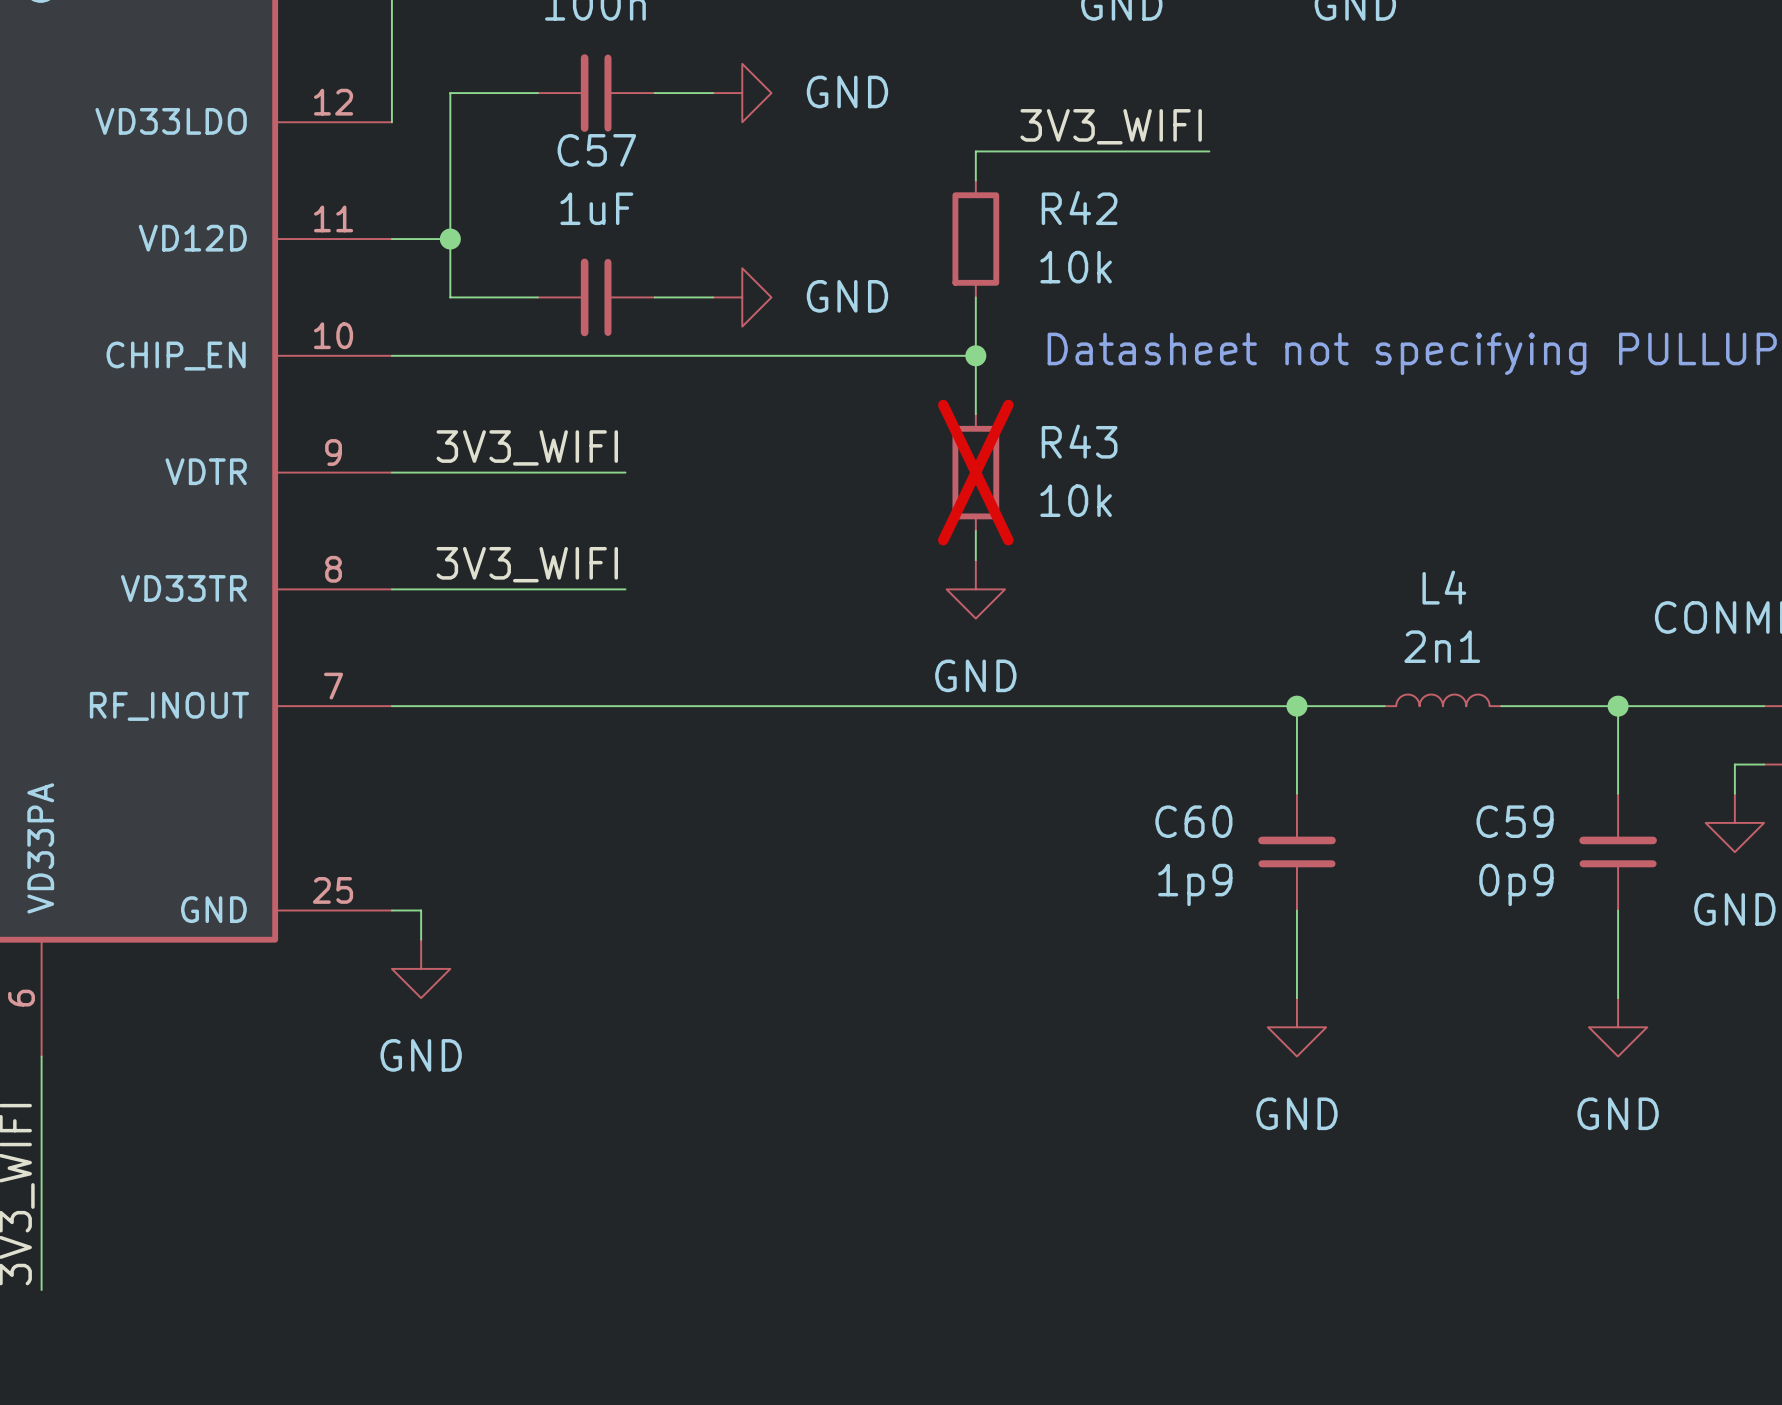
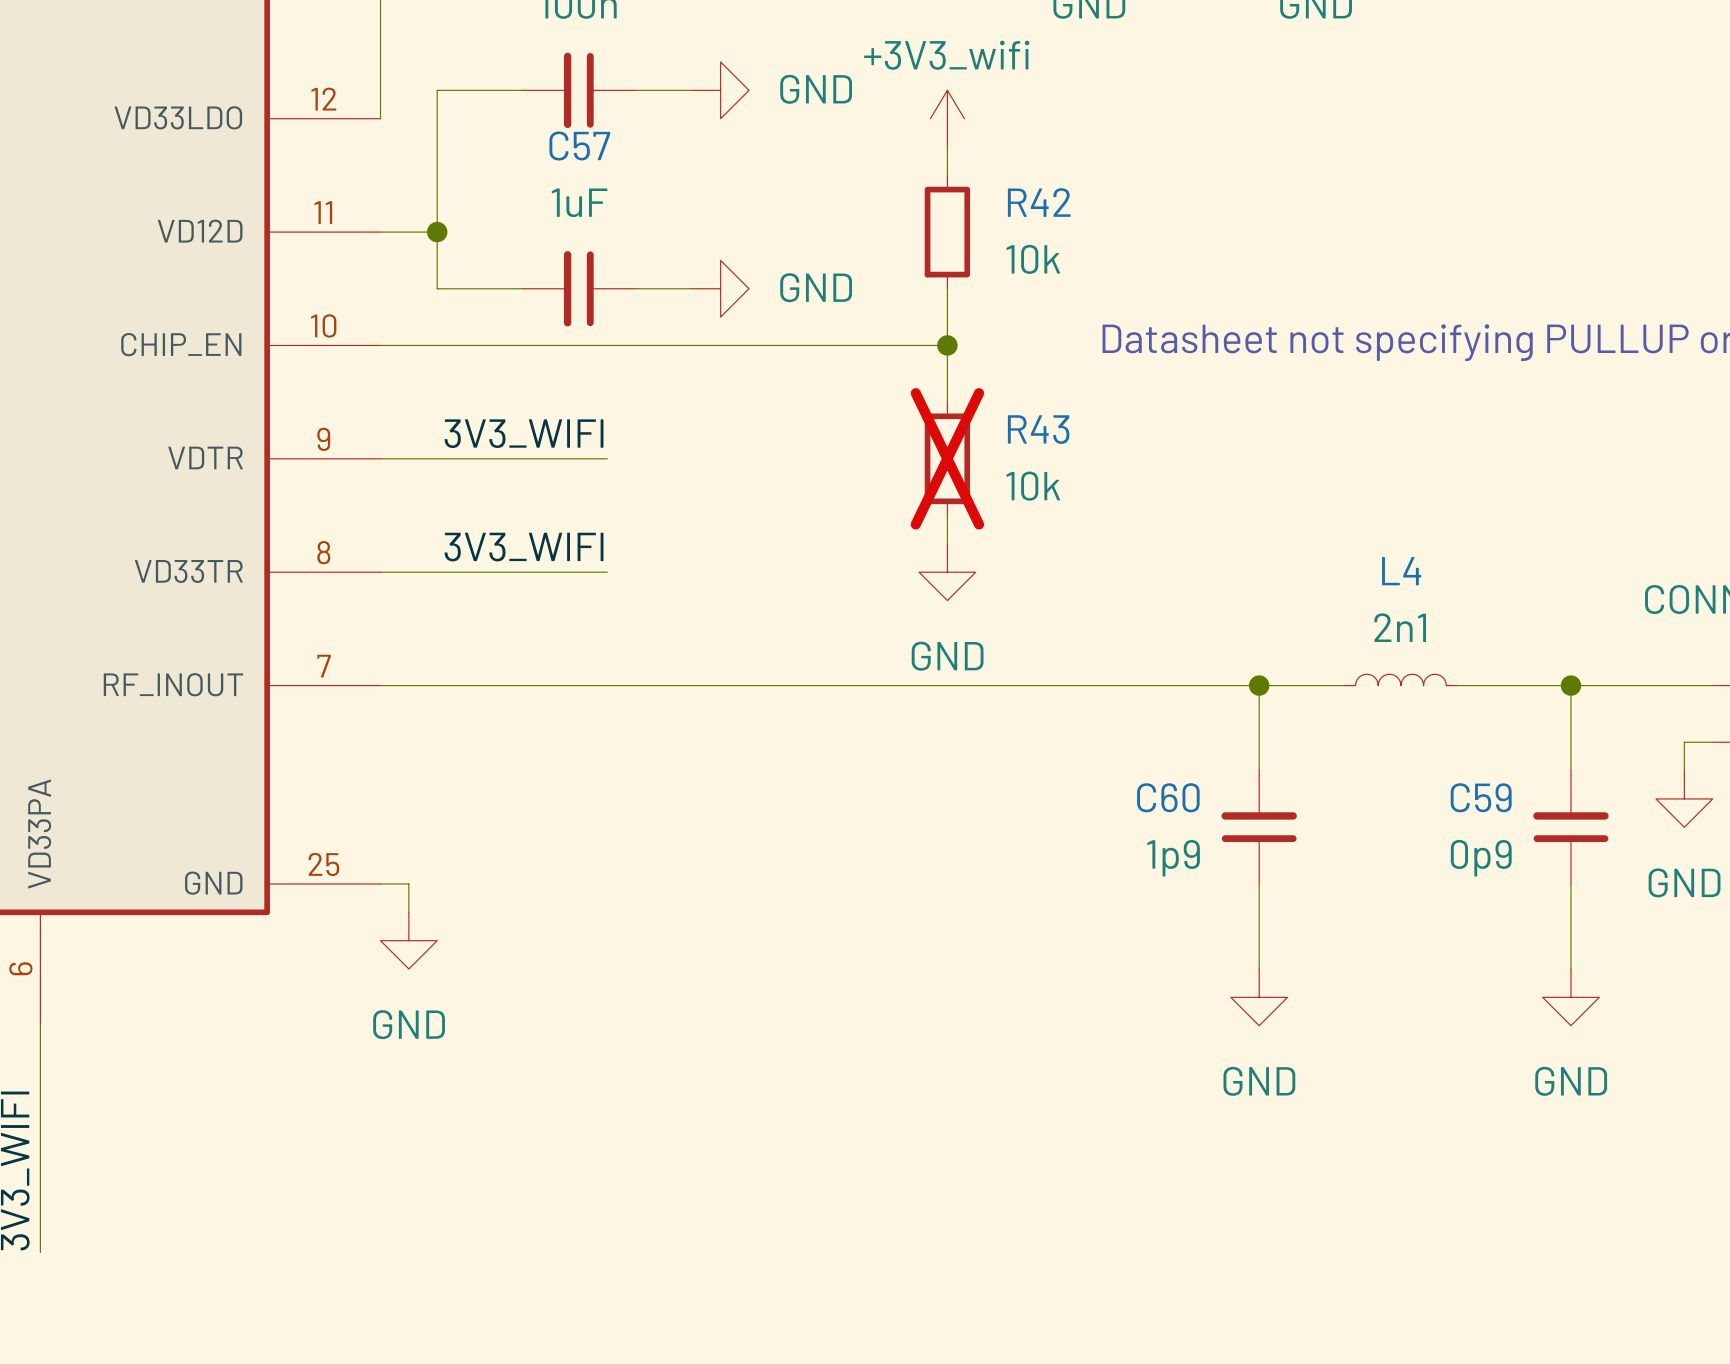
power symbol: none -> +3V3_wifi (947, 118)
label: 3V3_WIFI (1111, 126) -> none
wire: (975, 151) (1209, 151) -> none

